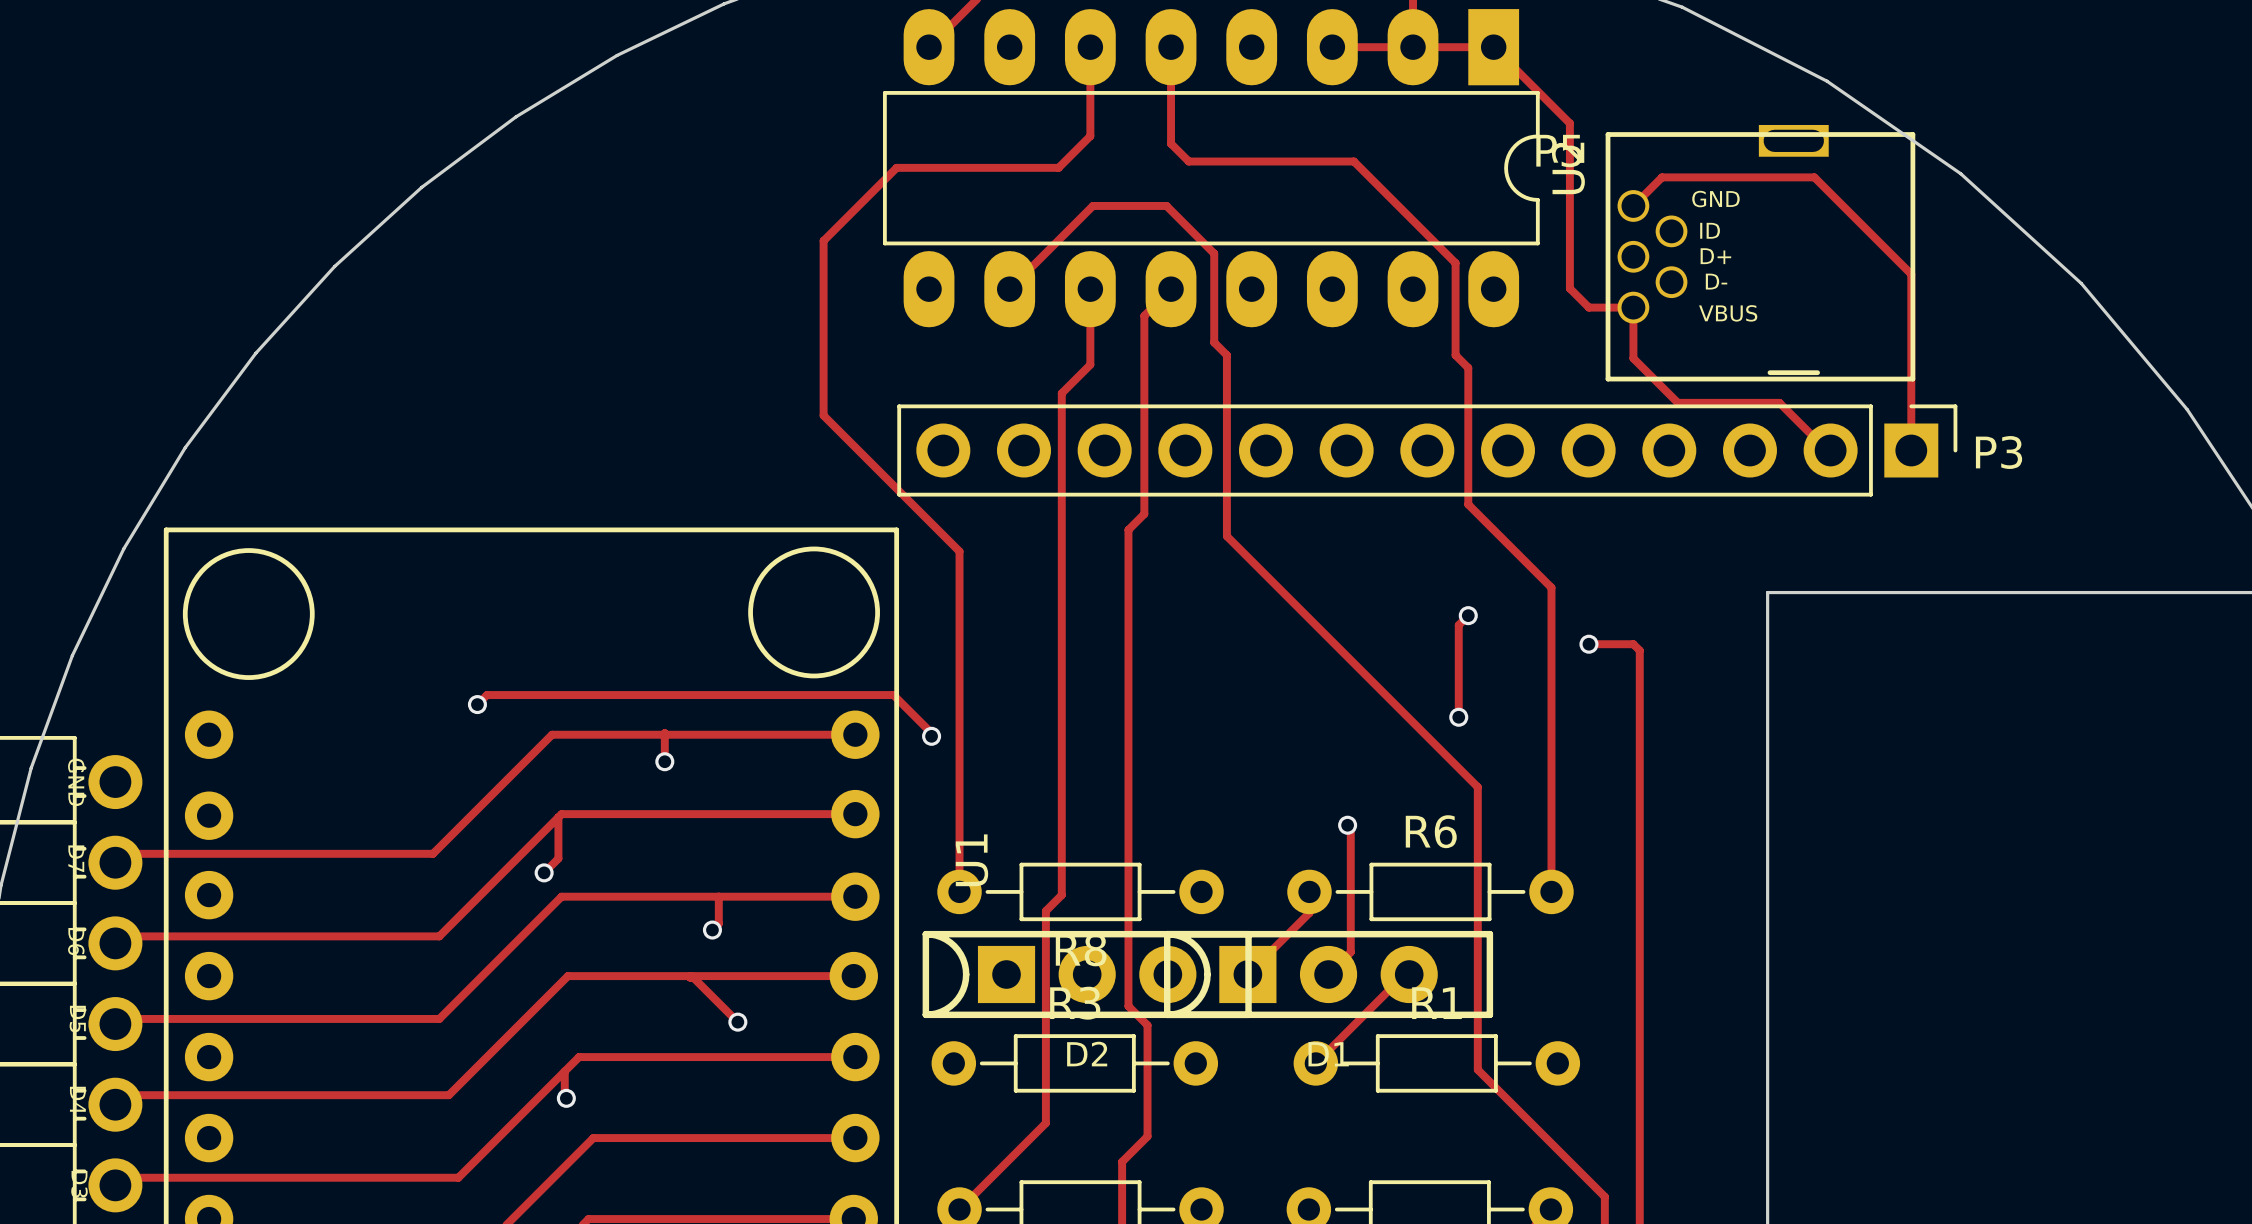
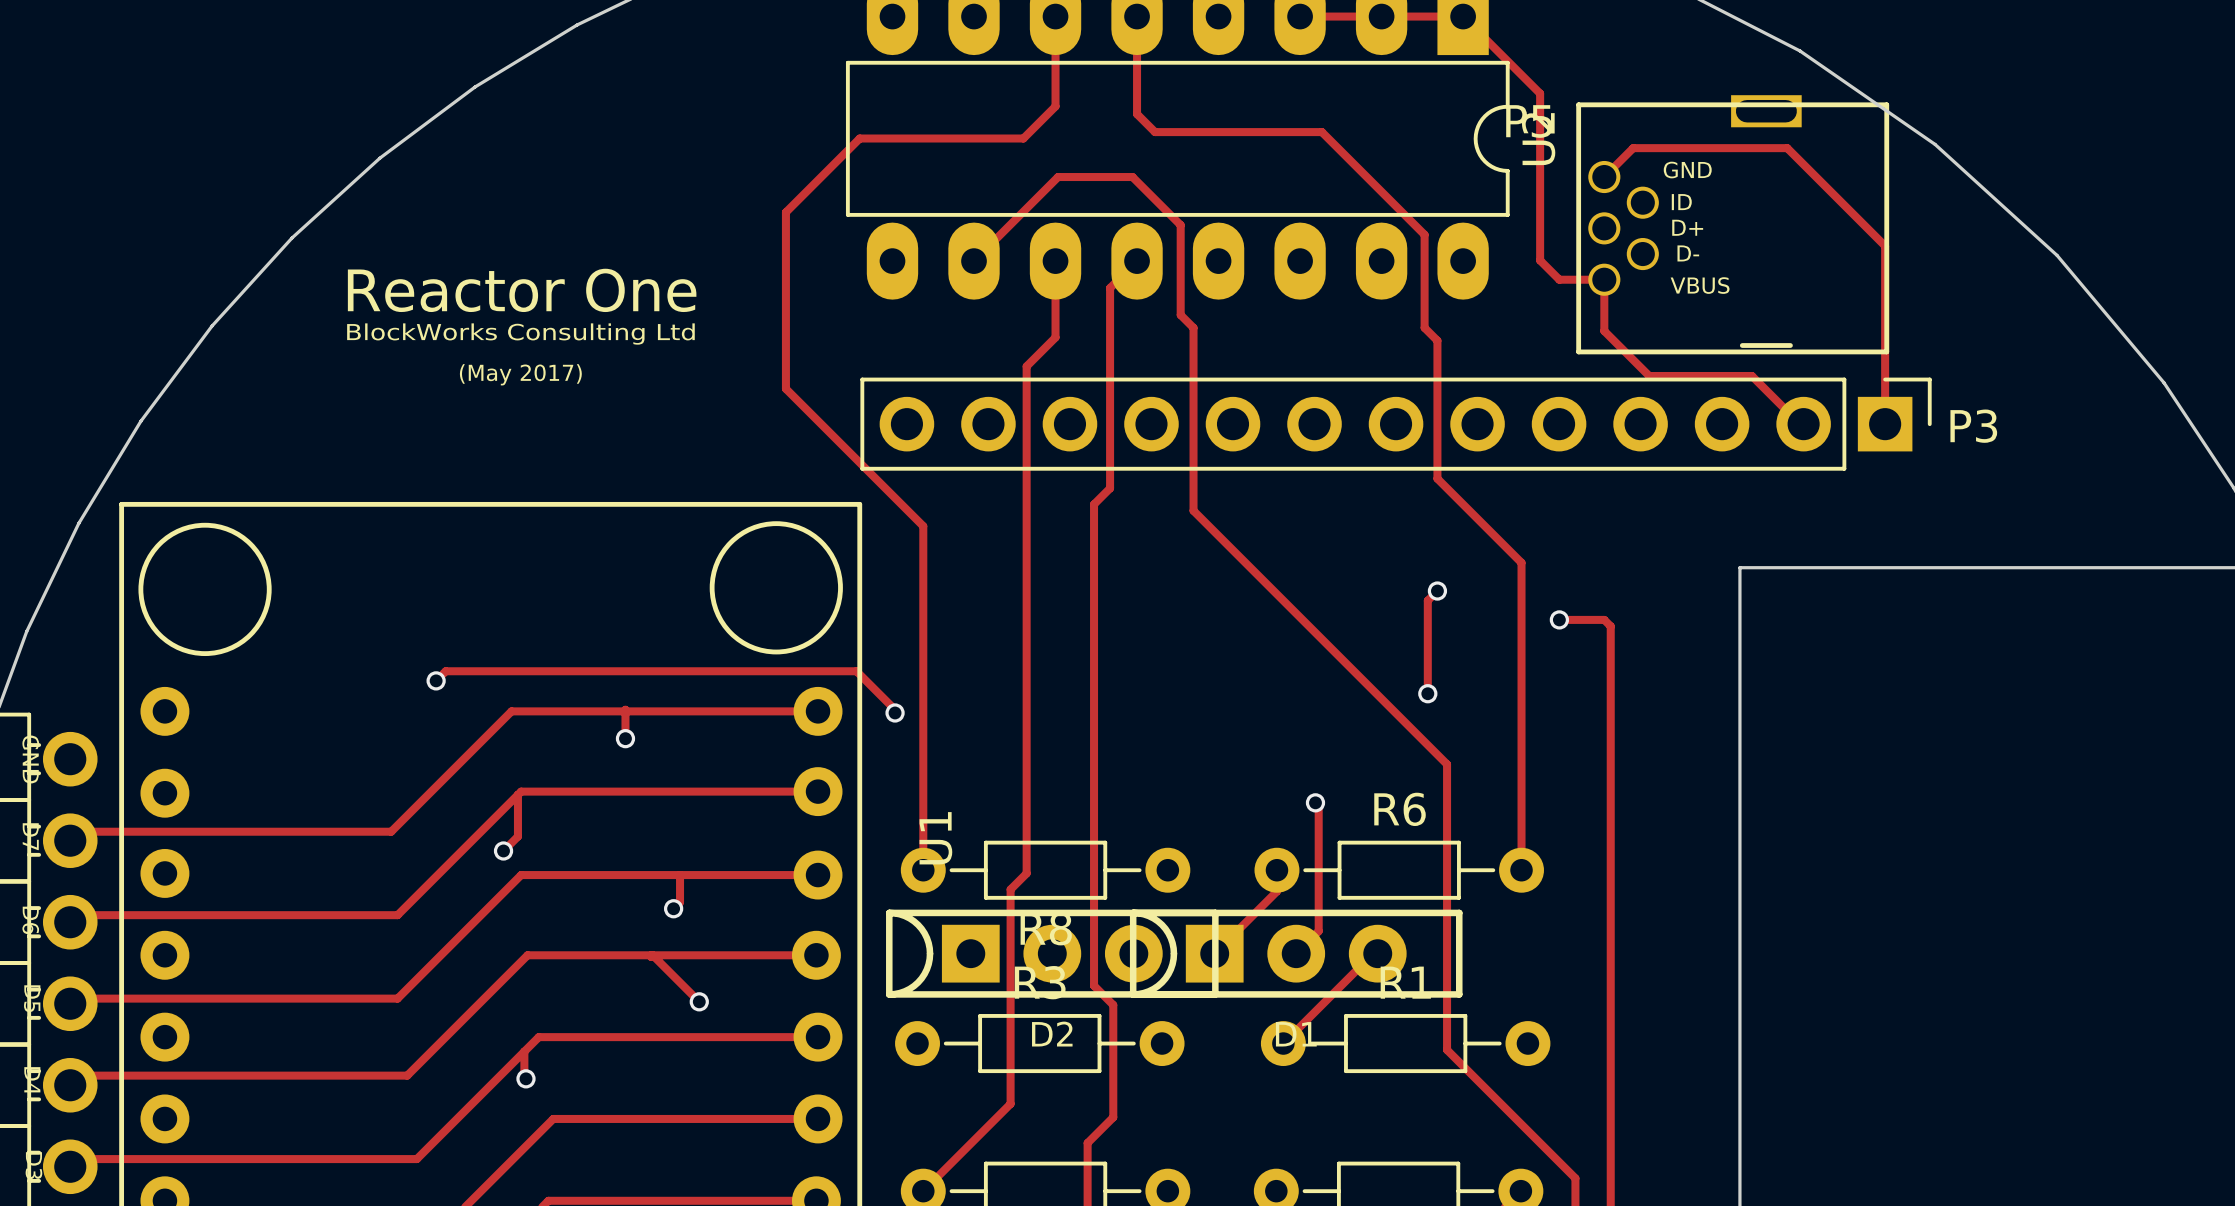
text: none -> Reactor One (522, 290)
text: none -> BlockWorks Consulting Ltd (520, 334)
text: none -> (May 2017) (520, 374)

